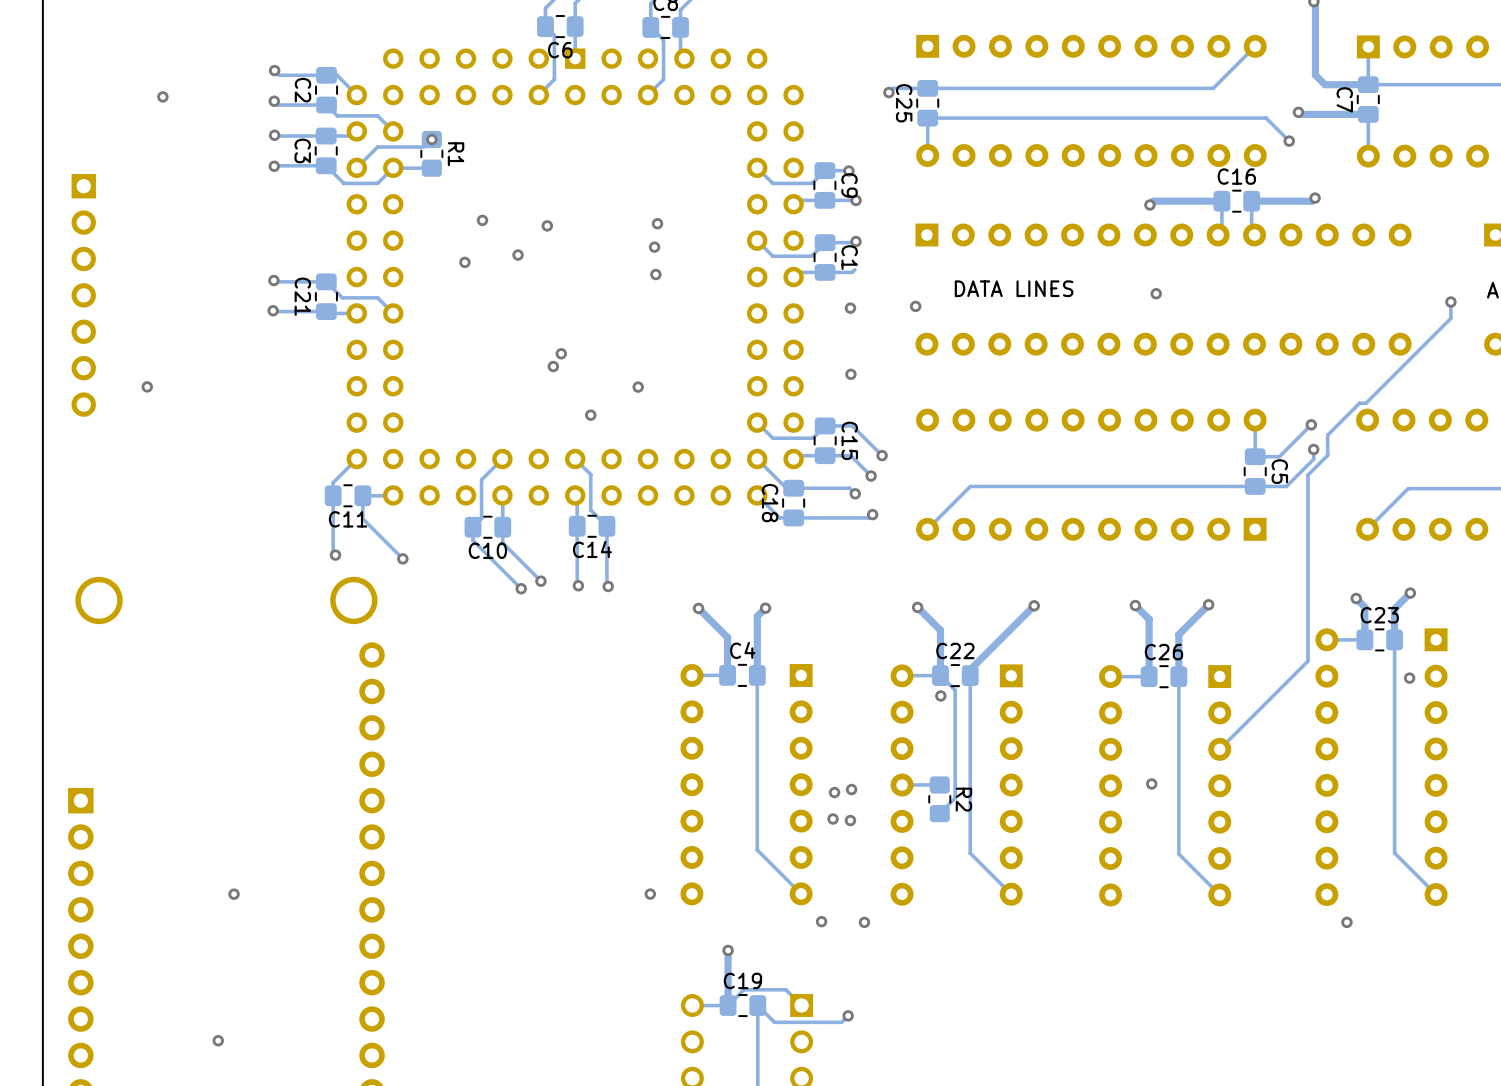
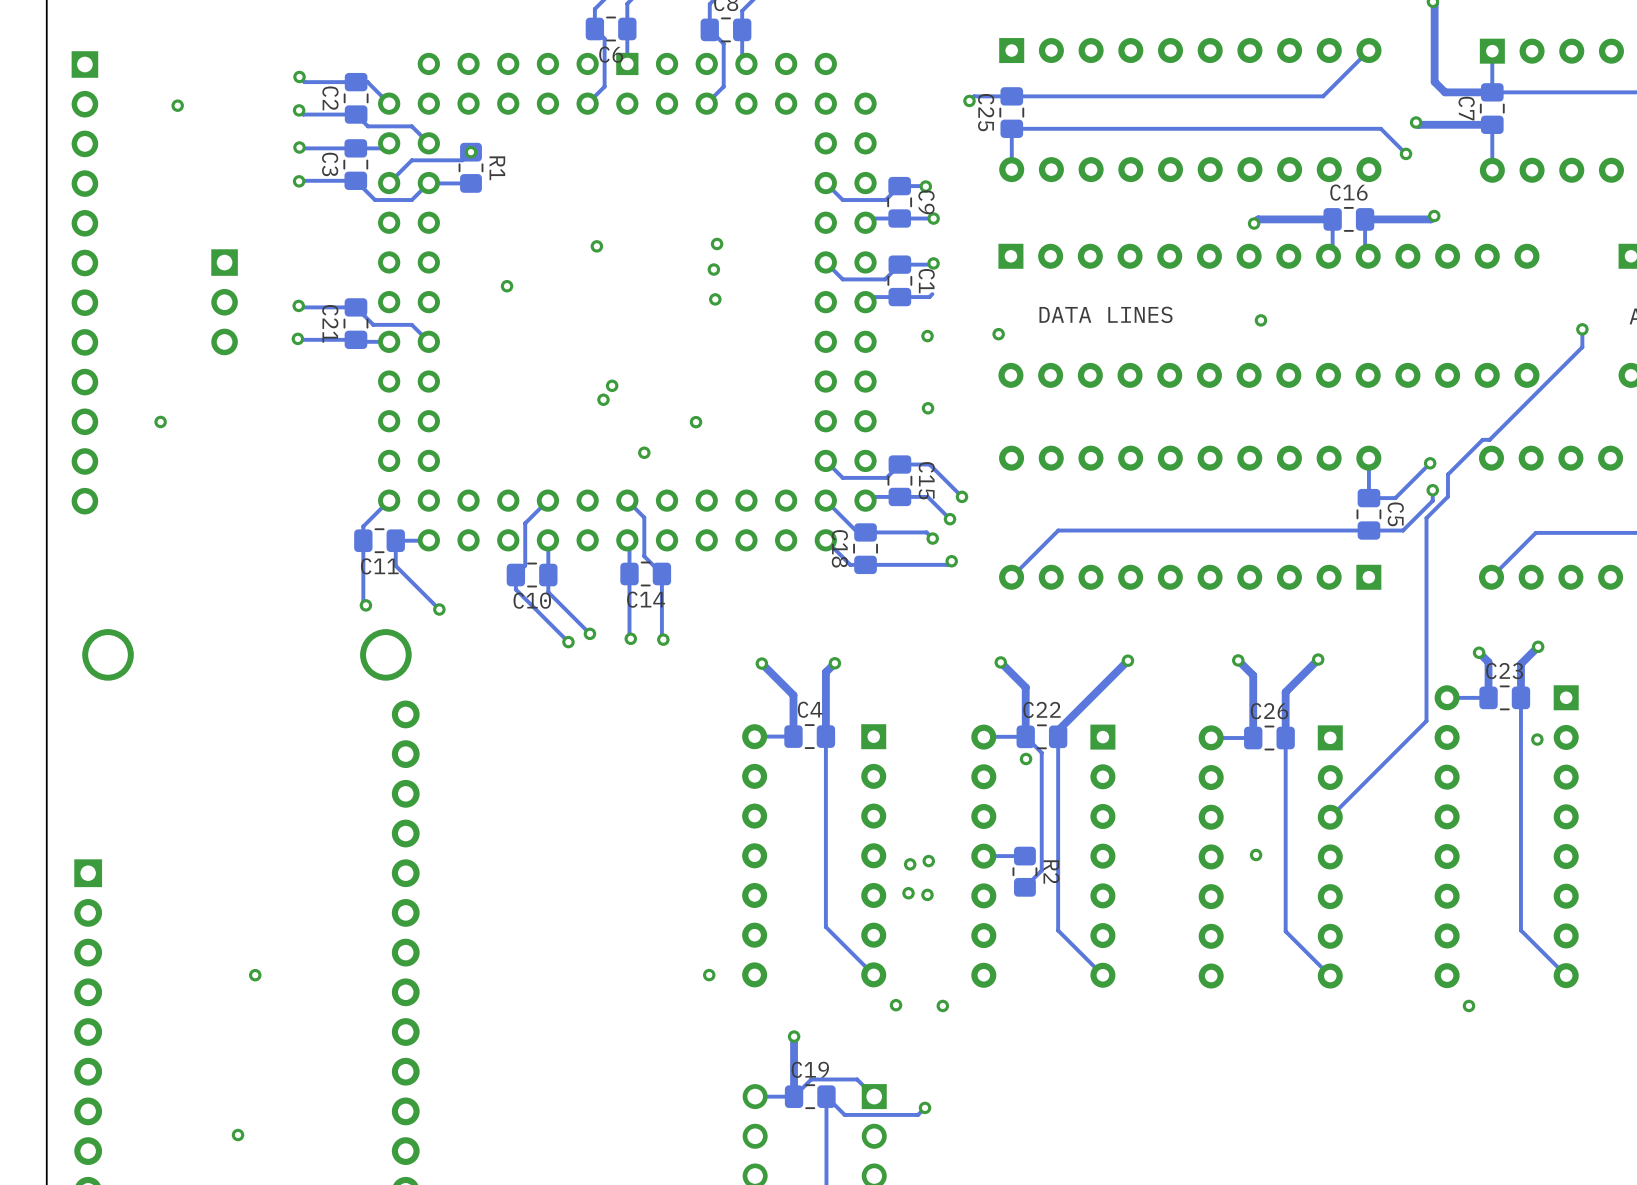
via: (482, 220) -> none
via: (518, 255) -> none
part: none -> (84, 282)
part: none -> (224, 302)
part: (83, 295) -> none

